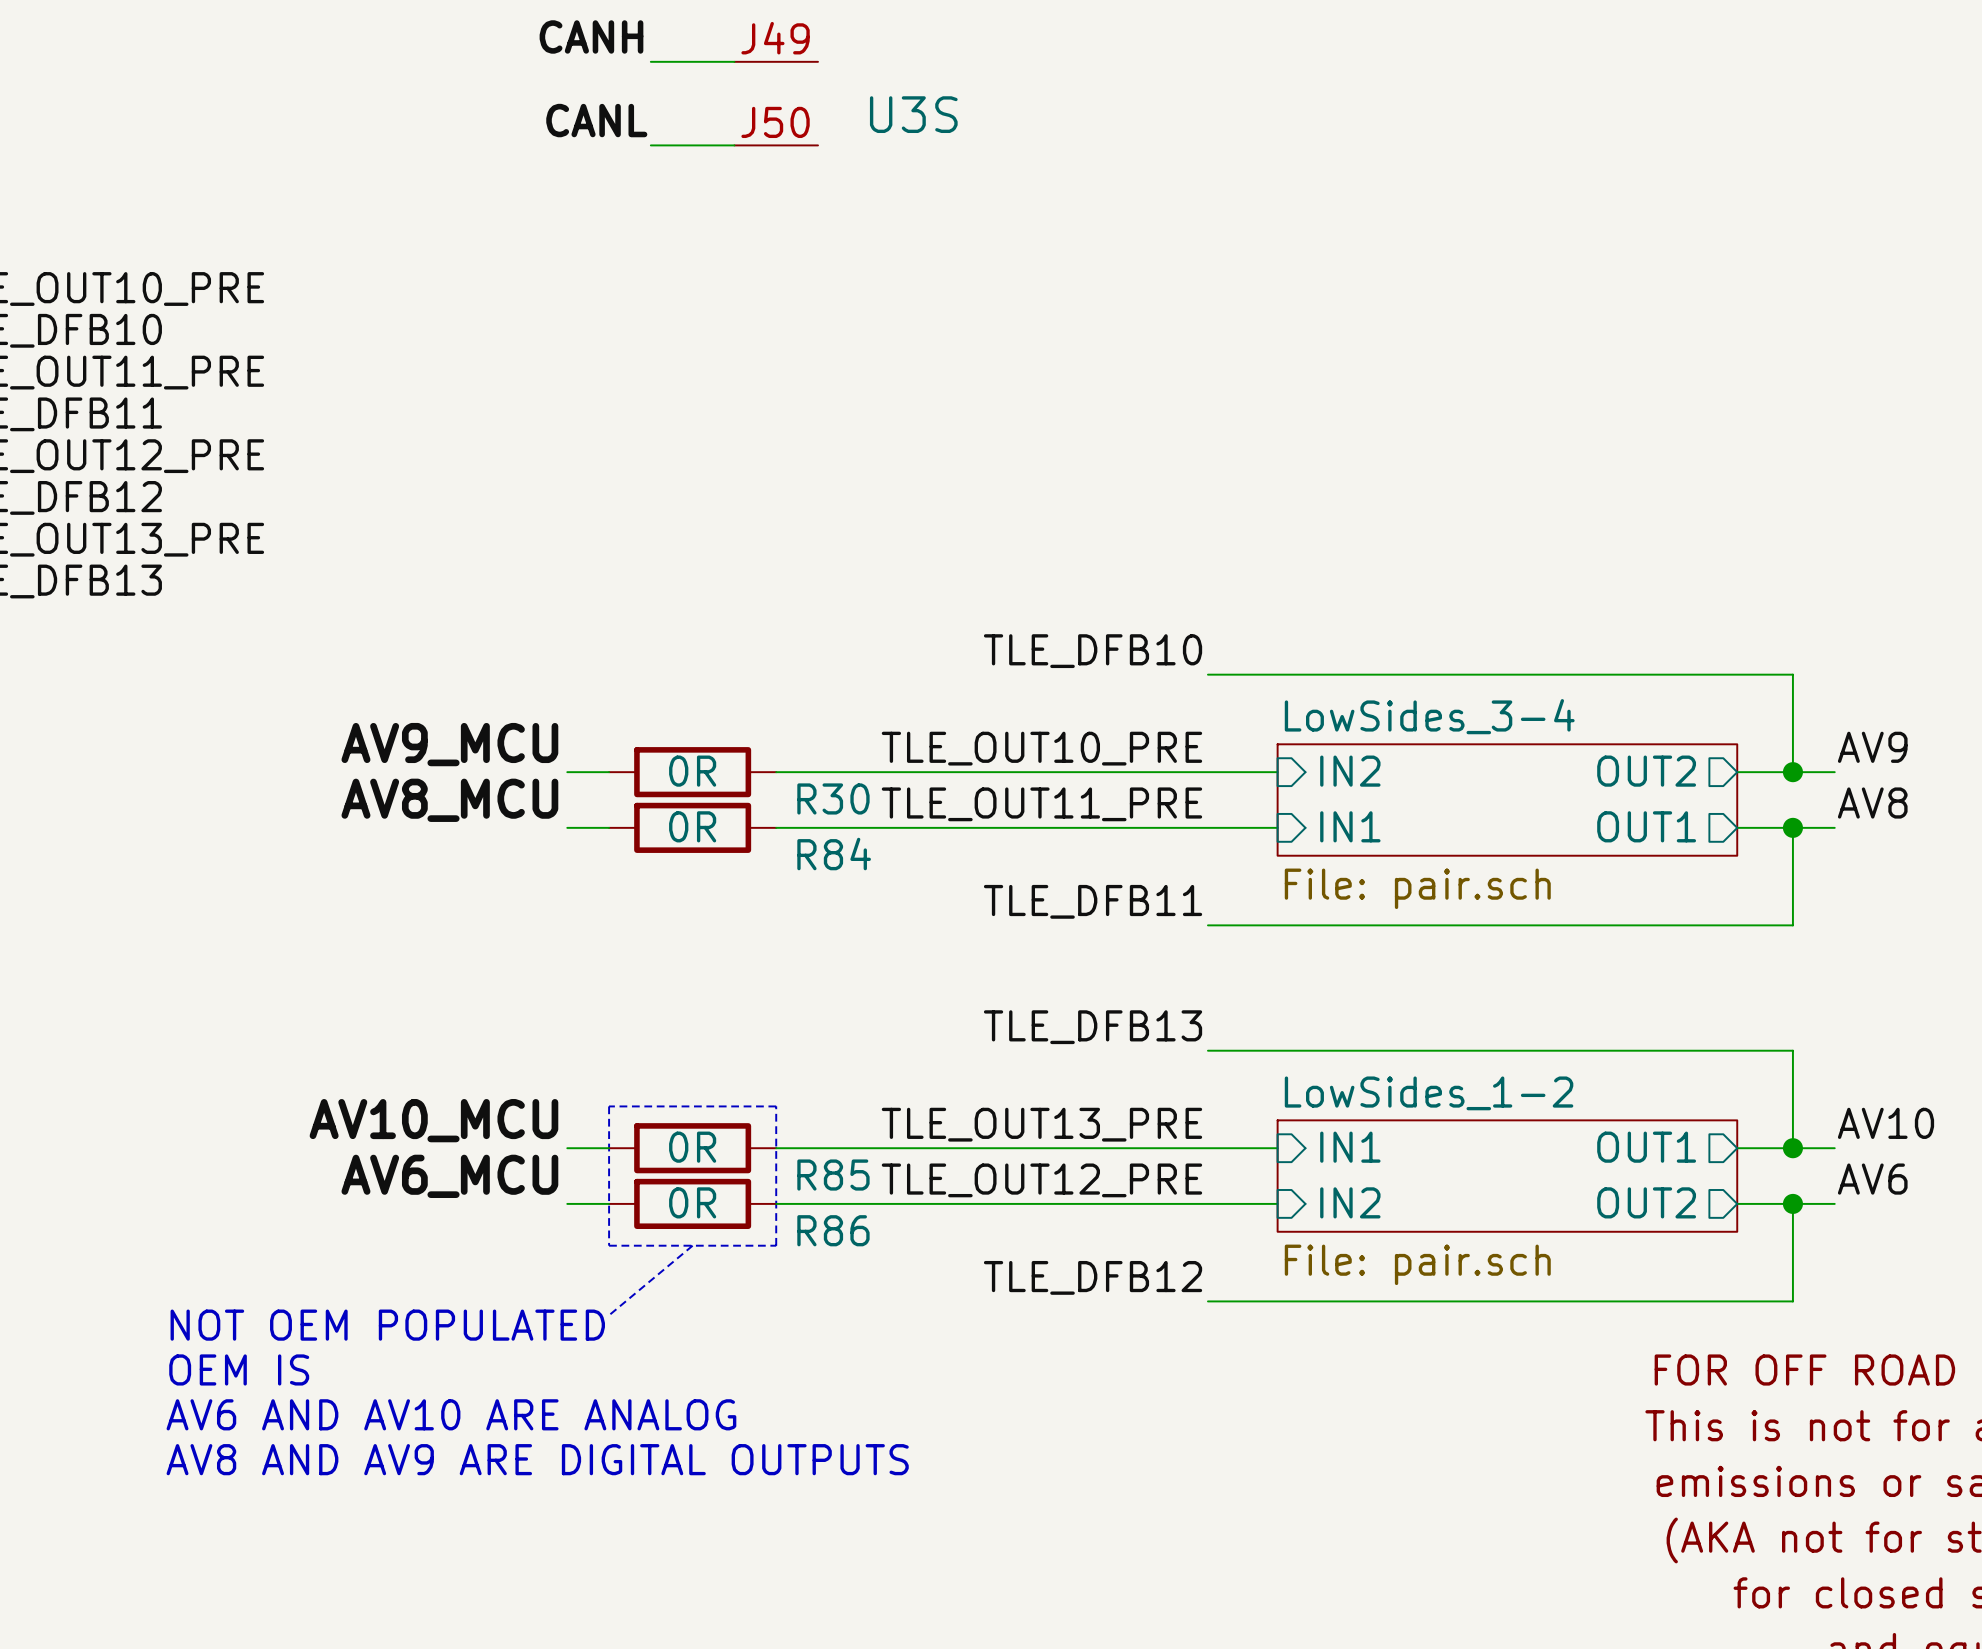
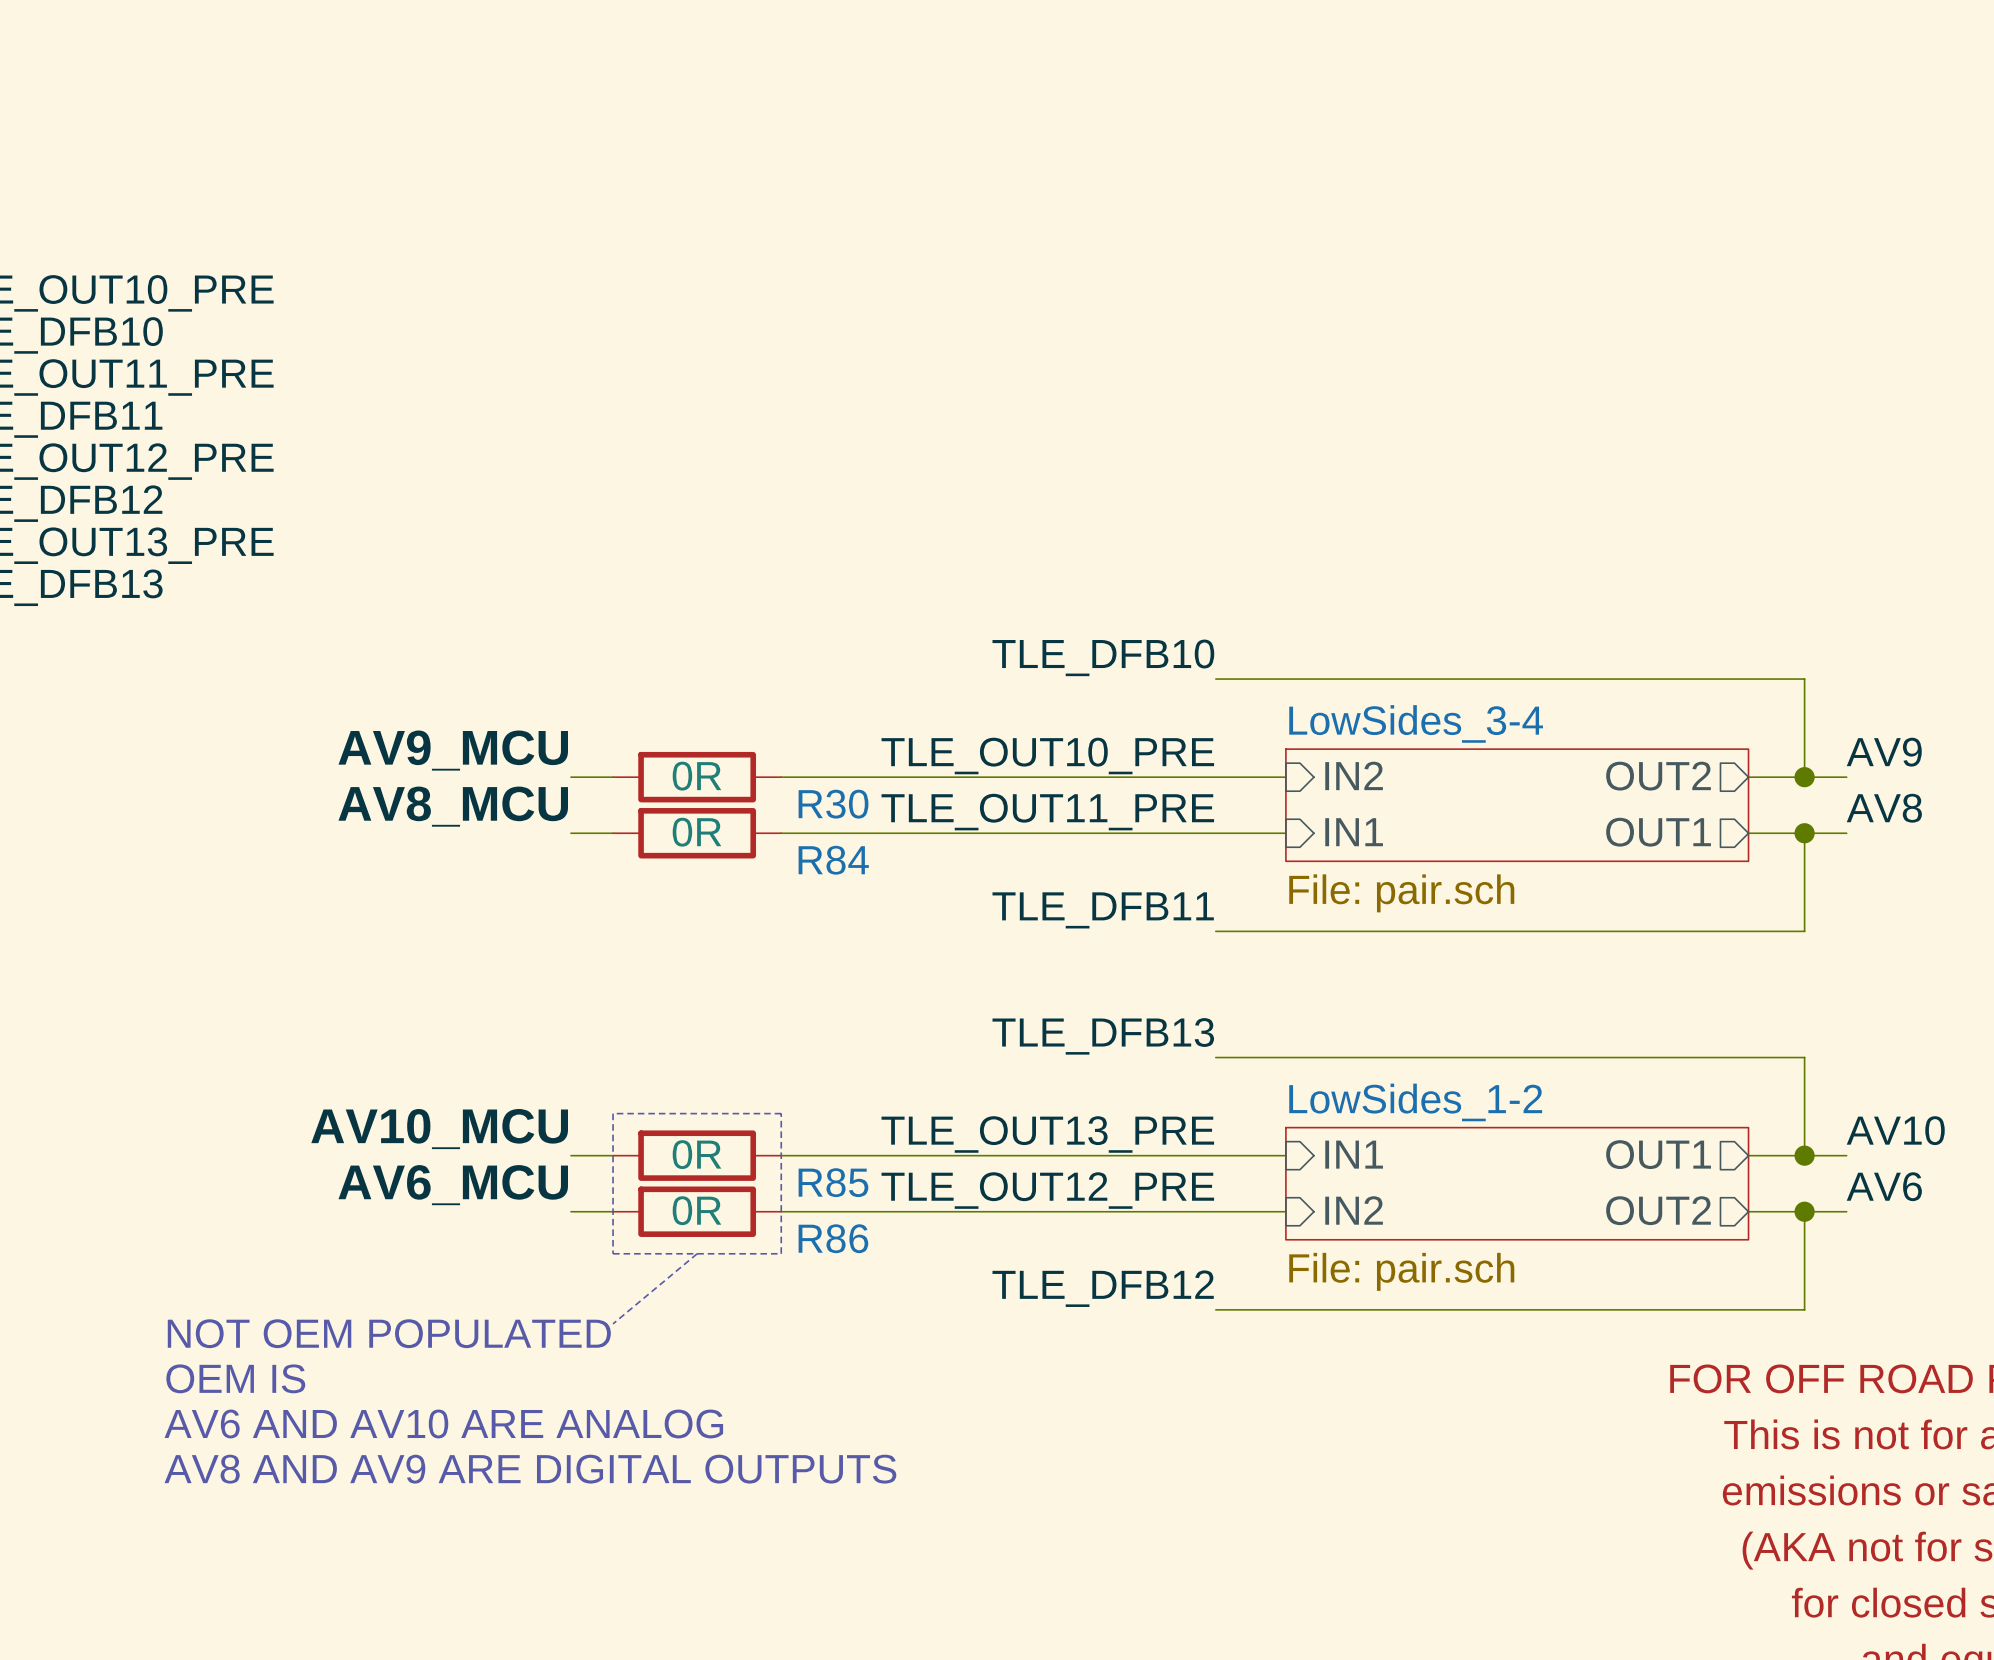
label: CANH (591, 36) -> none
wire: (650, 61) (734, 61) -> none
U3S: (776, 103) -> none
label: CANL (596, 120) -> none
wire: (650, 145) (734, 145) -> none

